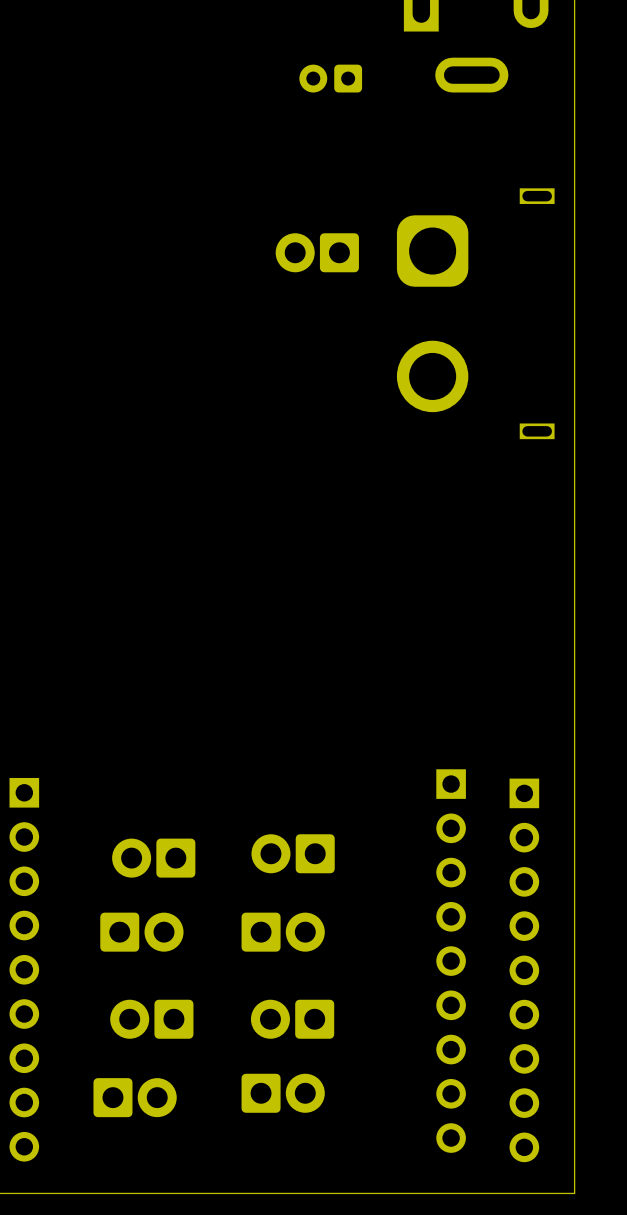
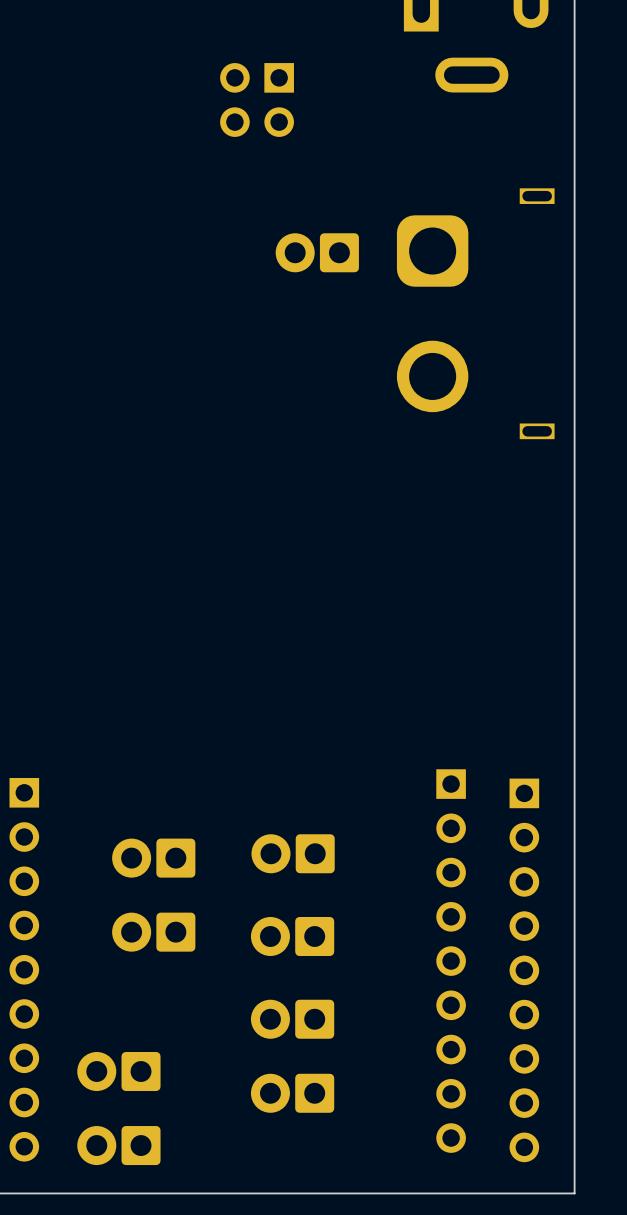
part: (330, 78) -> none
part: none -> (257, 99)
part rotation: 0° (141, 932) -> 180° (153, 932)
part rotation: 0° (283, 932) -> 180° (292, 936)
part: (151, 1019) -> none
part: none -> (118, 1071)
part rotation: 0° (283, 1093) -> 180° (292, 1093)
part: (135, 1097) -> none
part: none -> (118, 1145)

